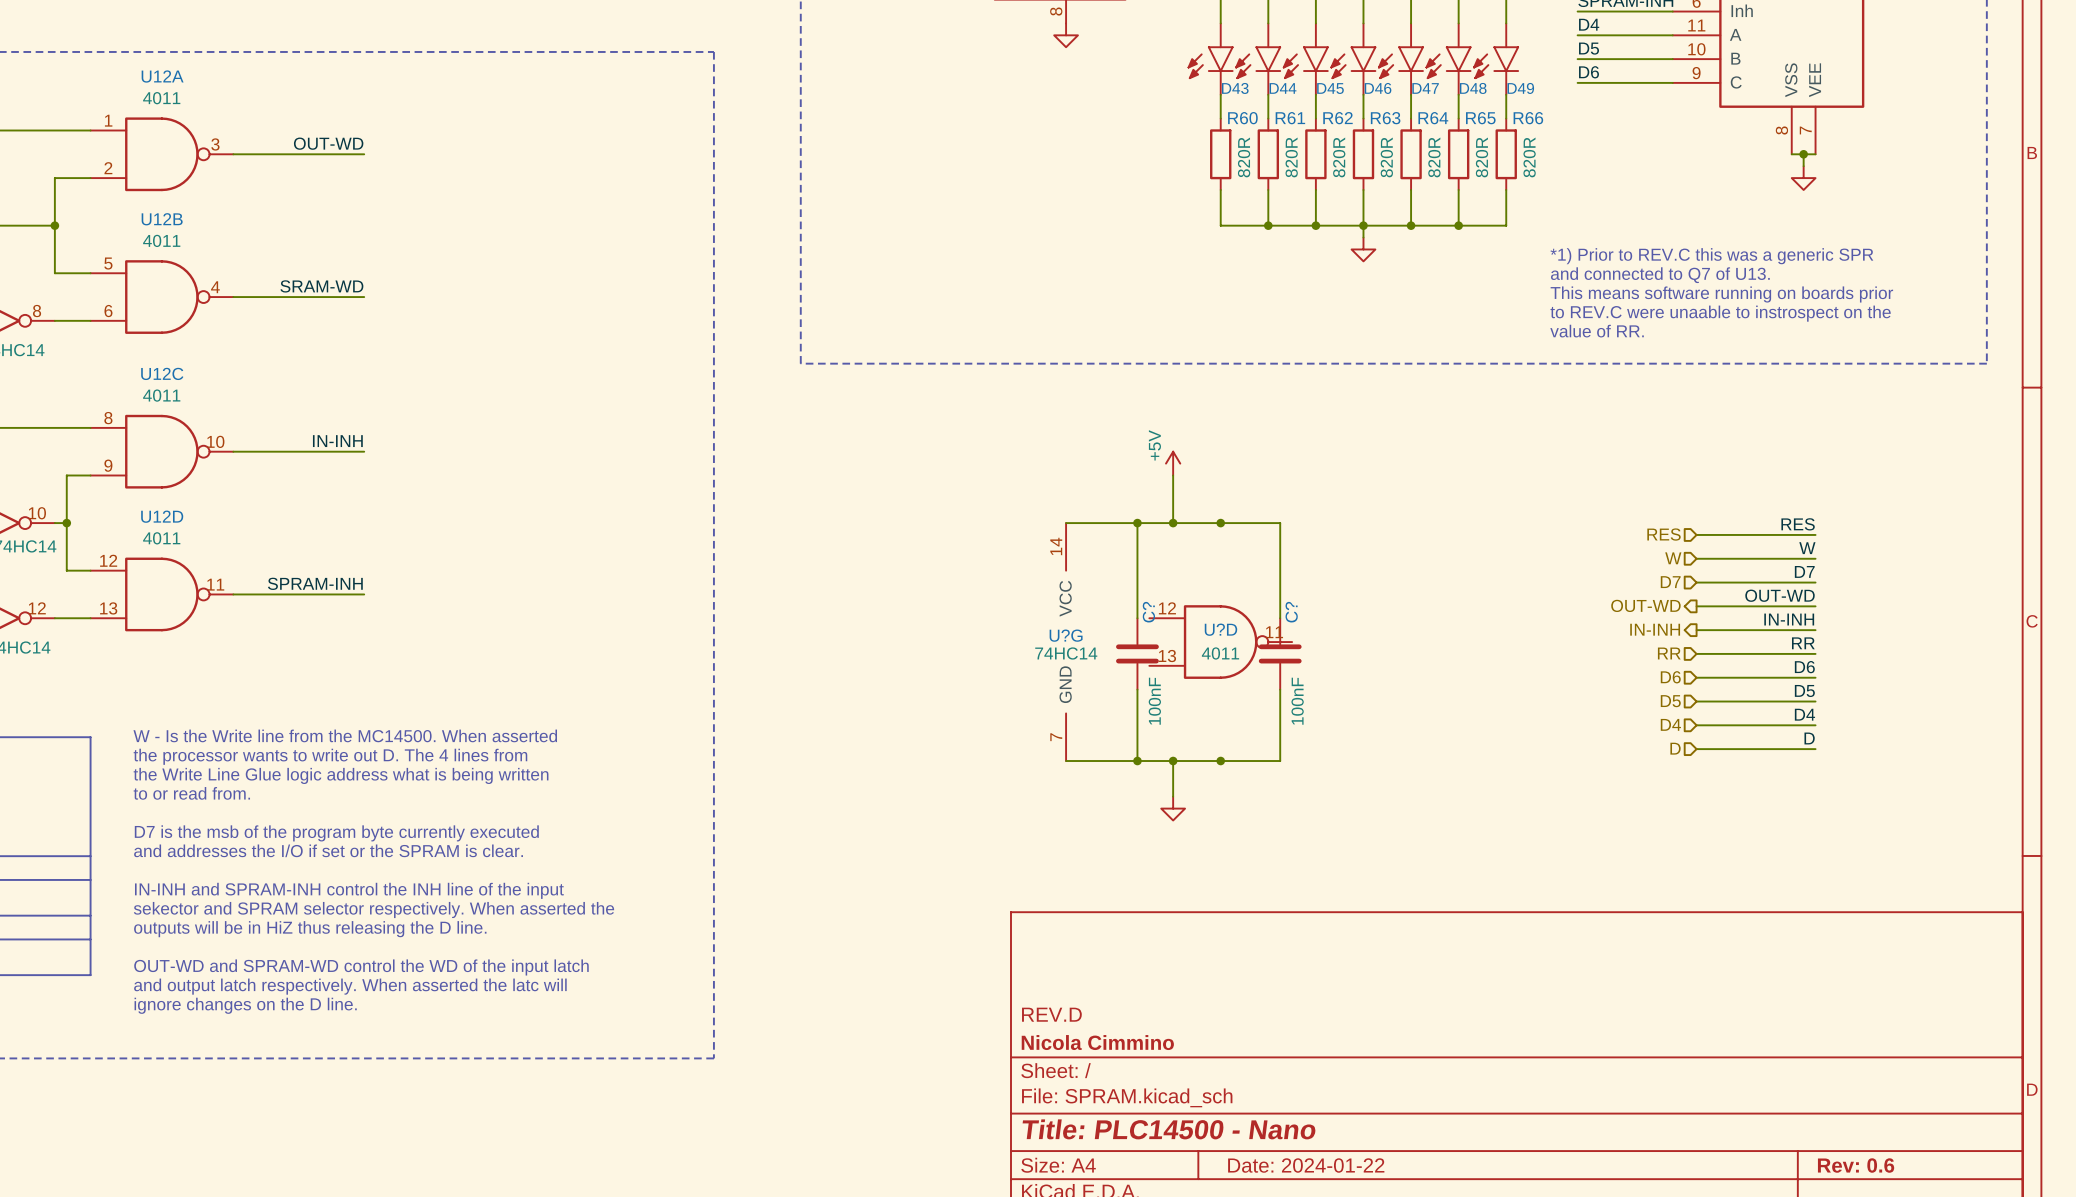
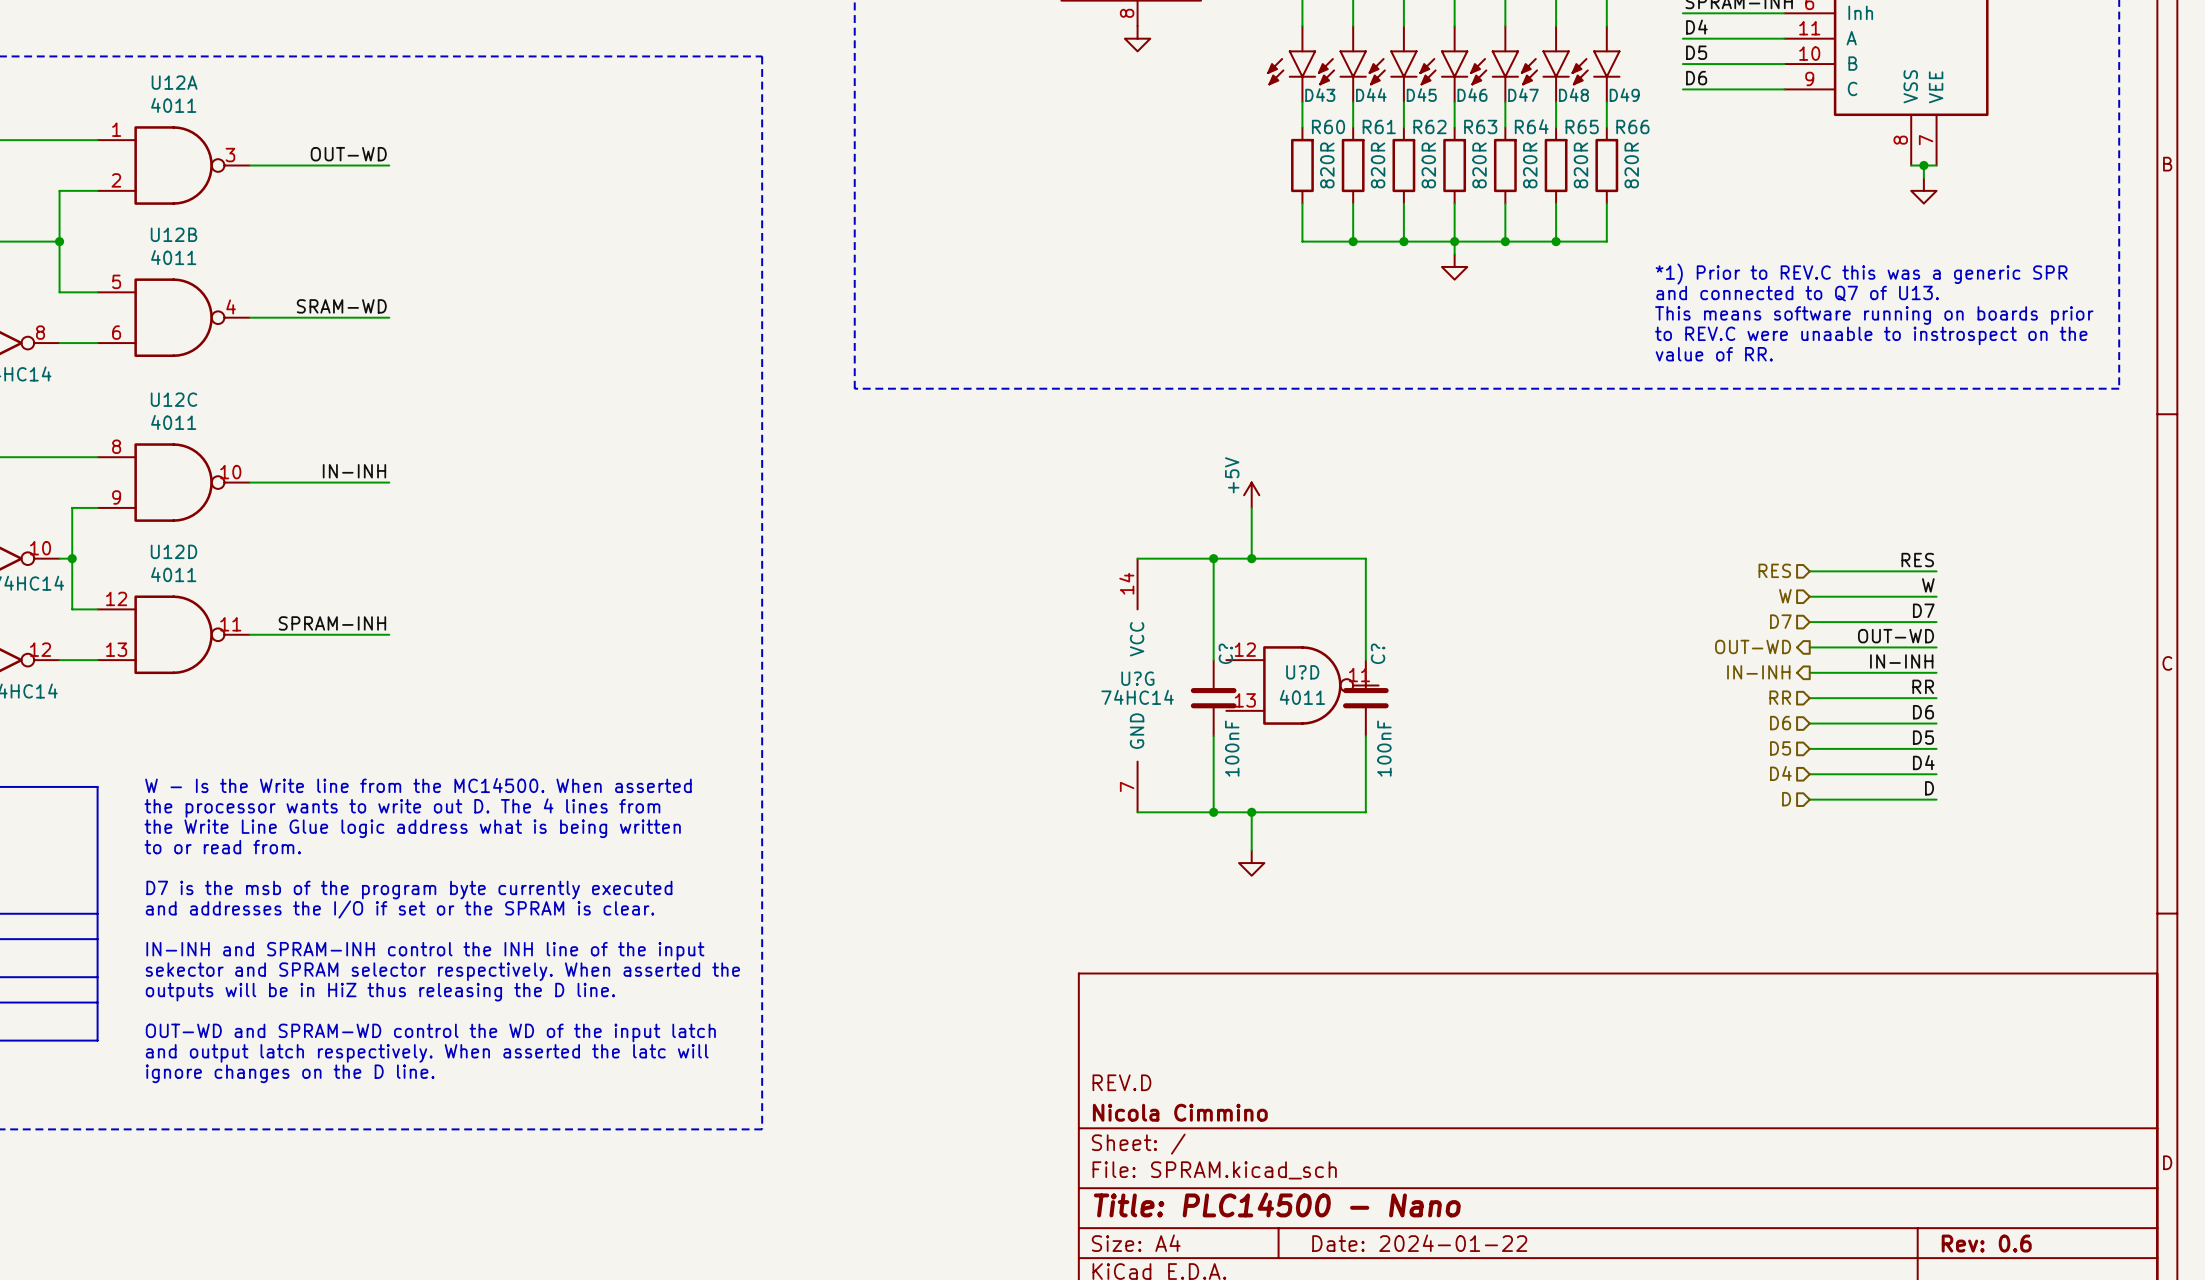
junction: (1220, 523) -> none
junction: (1220, 761) -> none

